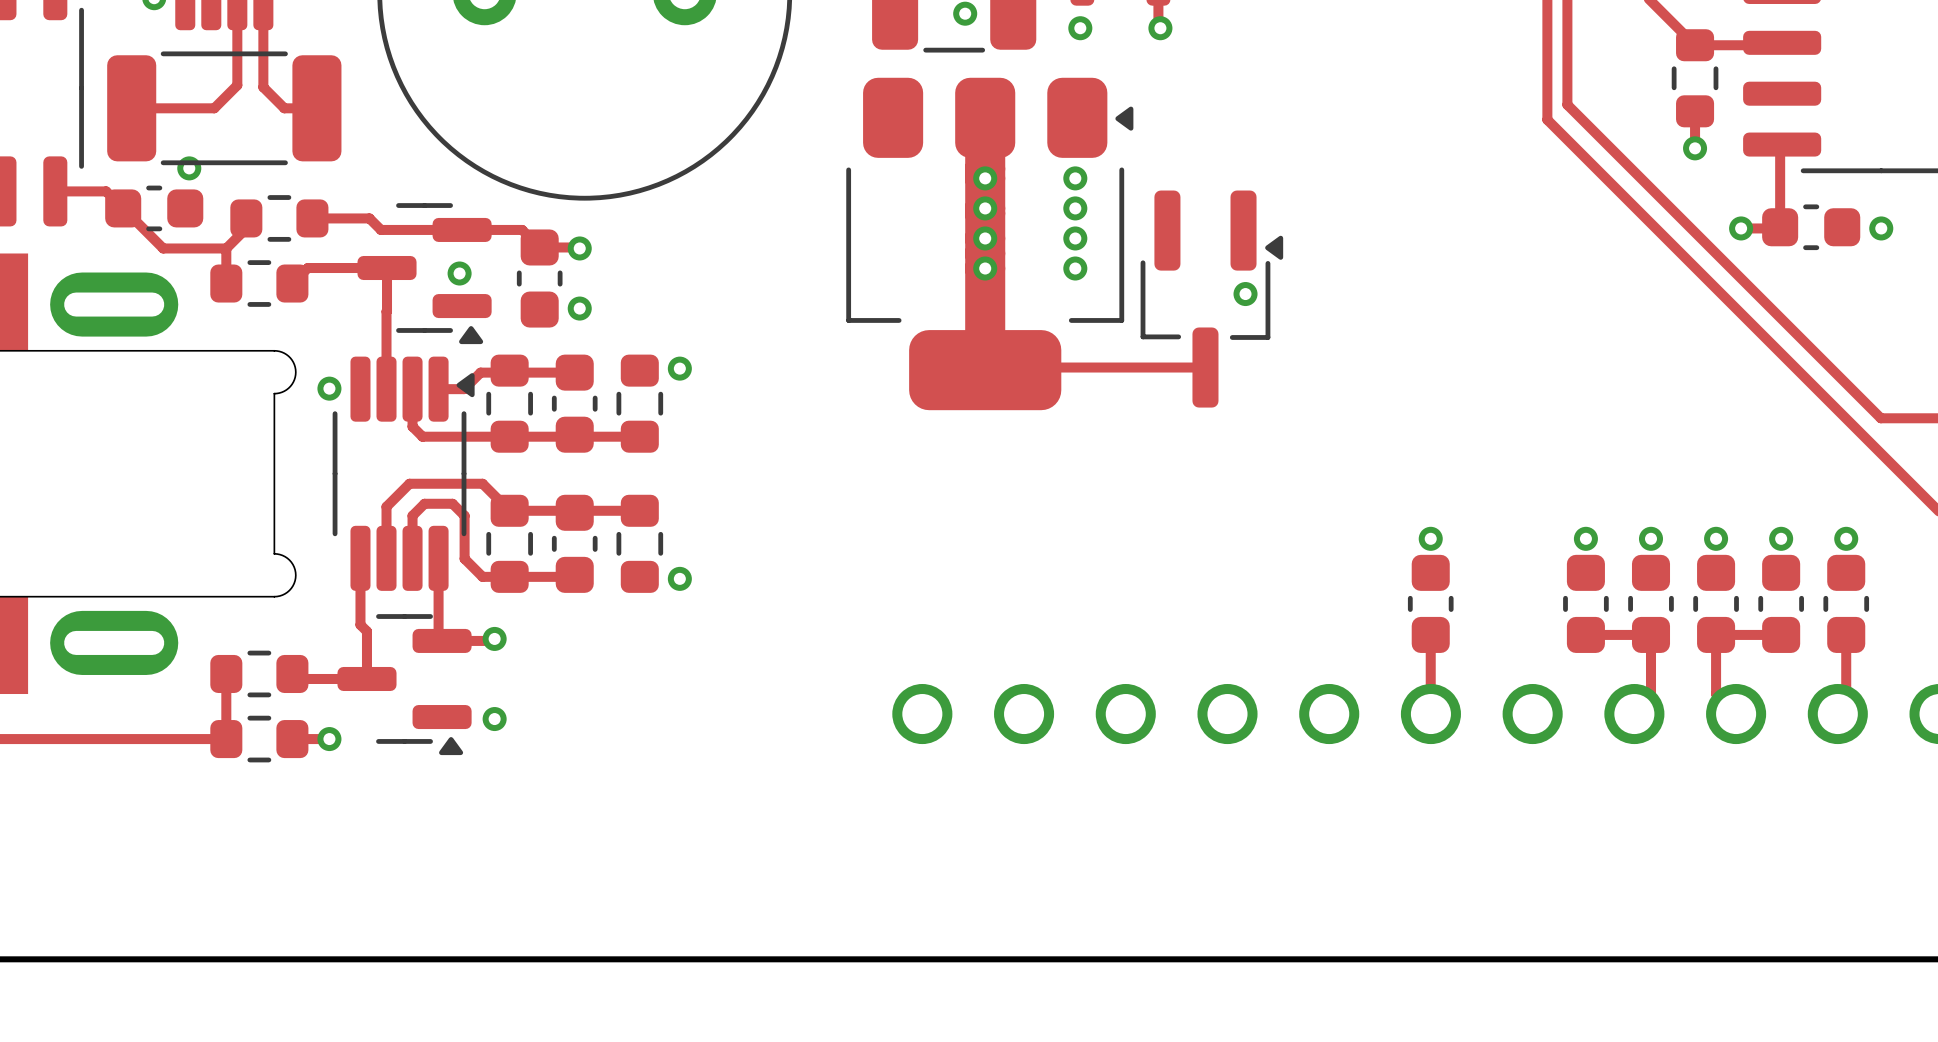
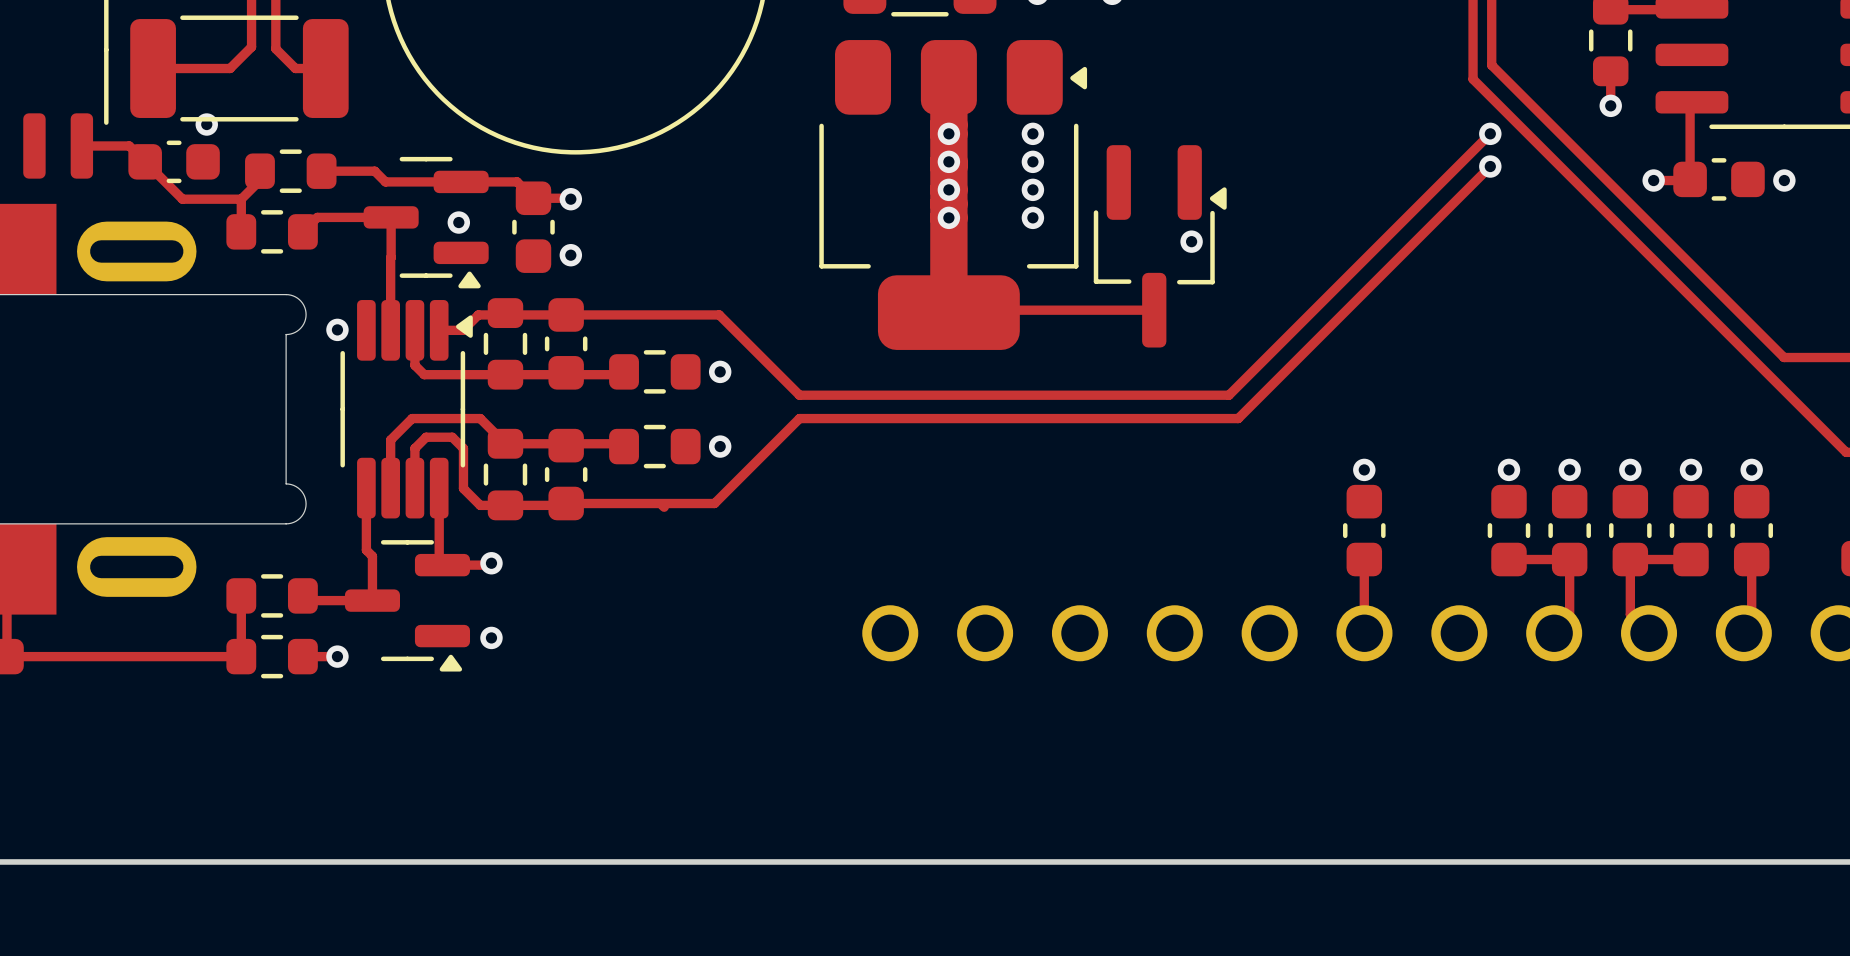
track: none -> (1490, 133) (1228, 395) (799, 395) (719, 314) (566, 314)
via: none -> (1490, 133)
track: none -> (1490, 166) (1238, 418) (799, 418) (714, 503) (566, 503)
via: none -> (1490, 166)
via: (679, 368) -> none
part rotation: 0° (639, 403) -> 90° clockwise (654, 371)
via: none -> (720, 371)
via: none -> (720, 446)
part rotation: 0° (639, 543) -> 90° clockwise (654, 446)
via: (679, 578) -> none

